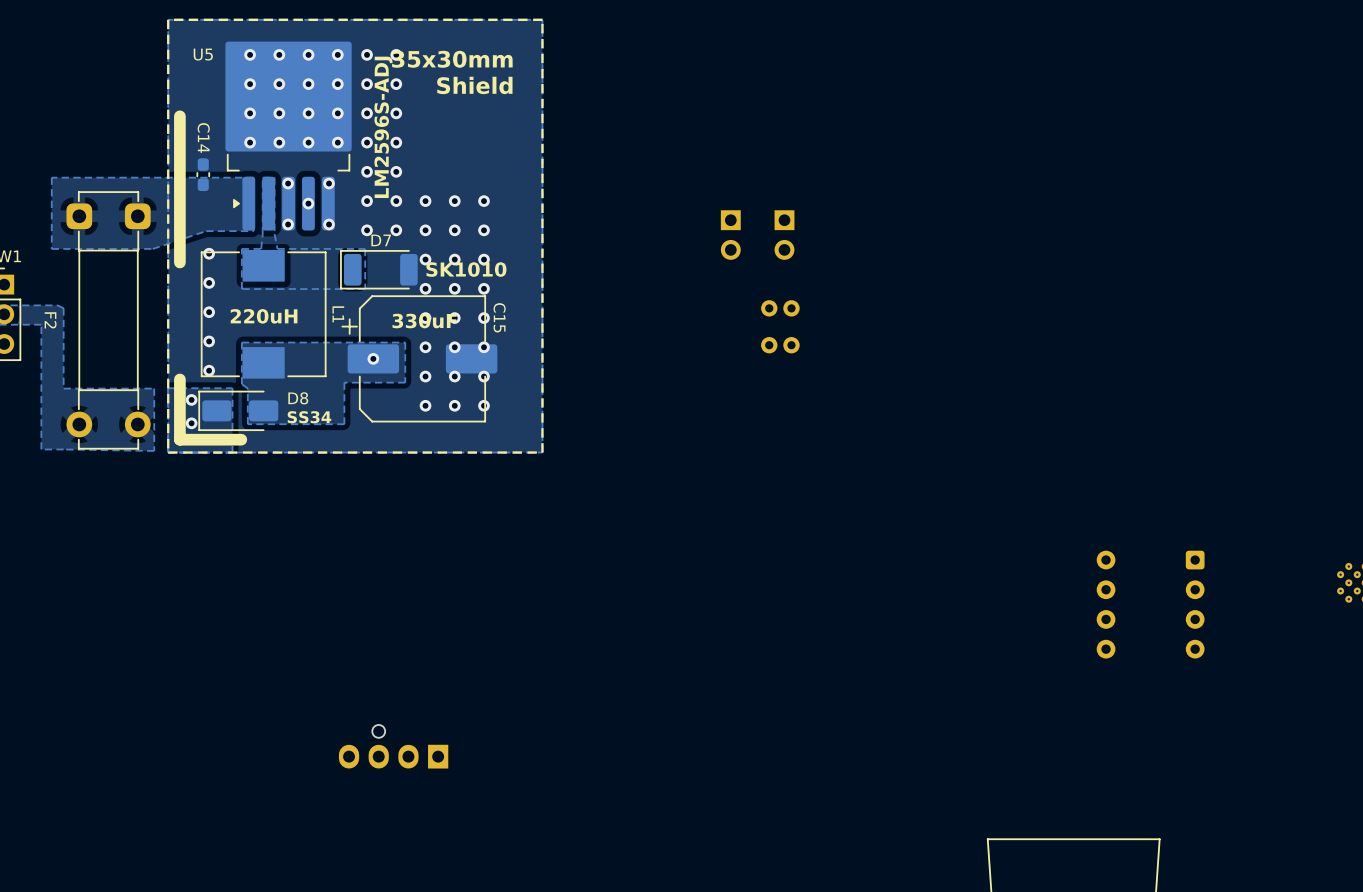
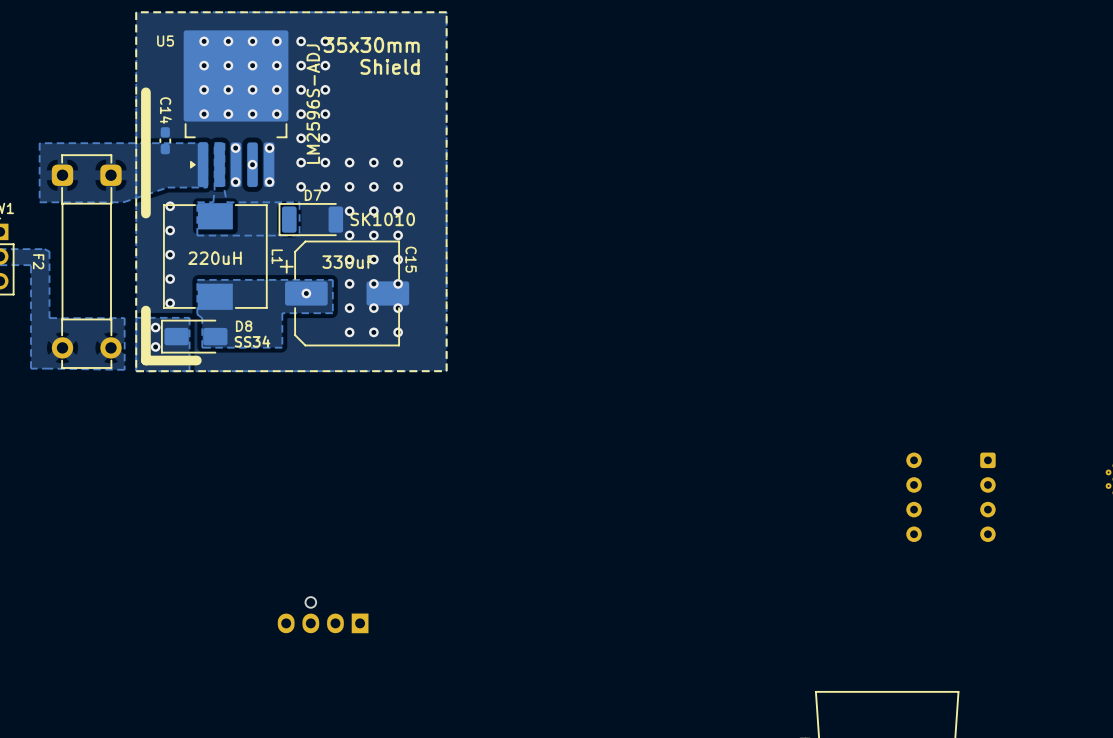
part: (730, 235) -> none
part: (784, 235) -> none
part: (780, 308) -> none
part: (780, 345) -> none

